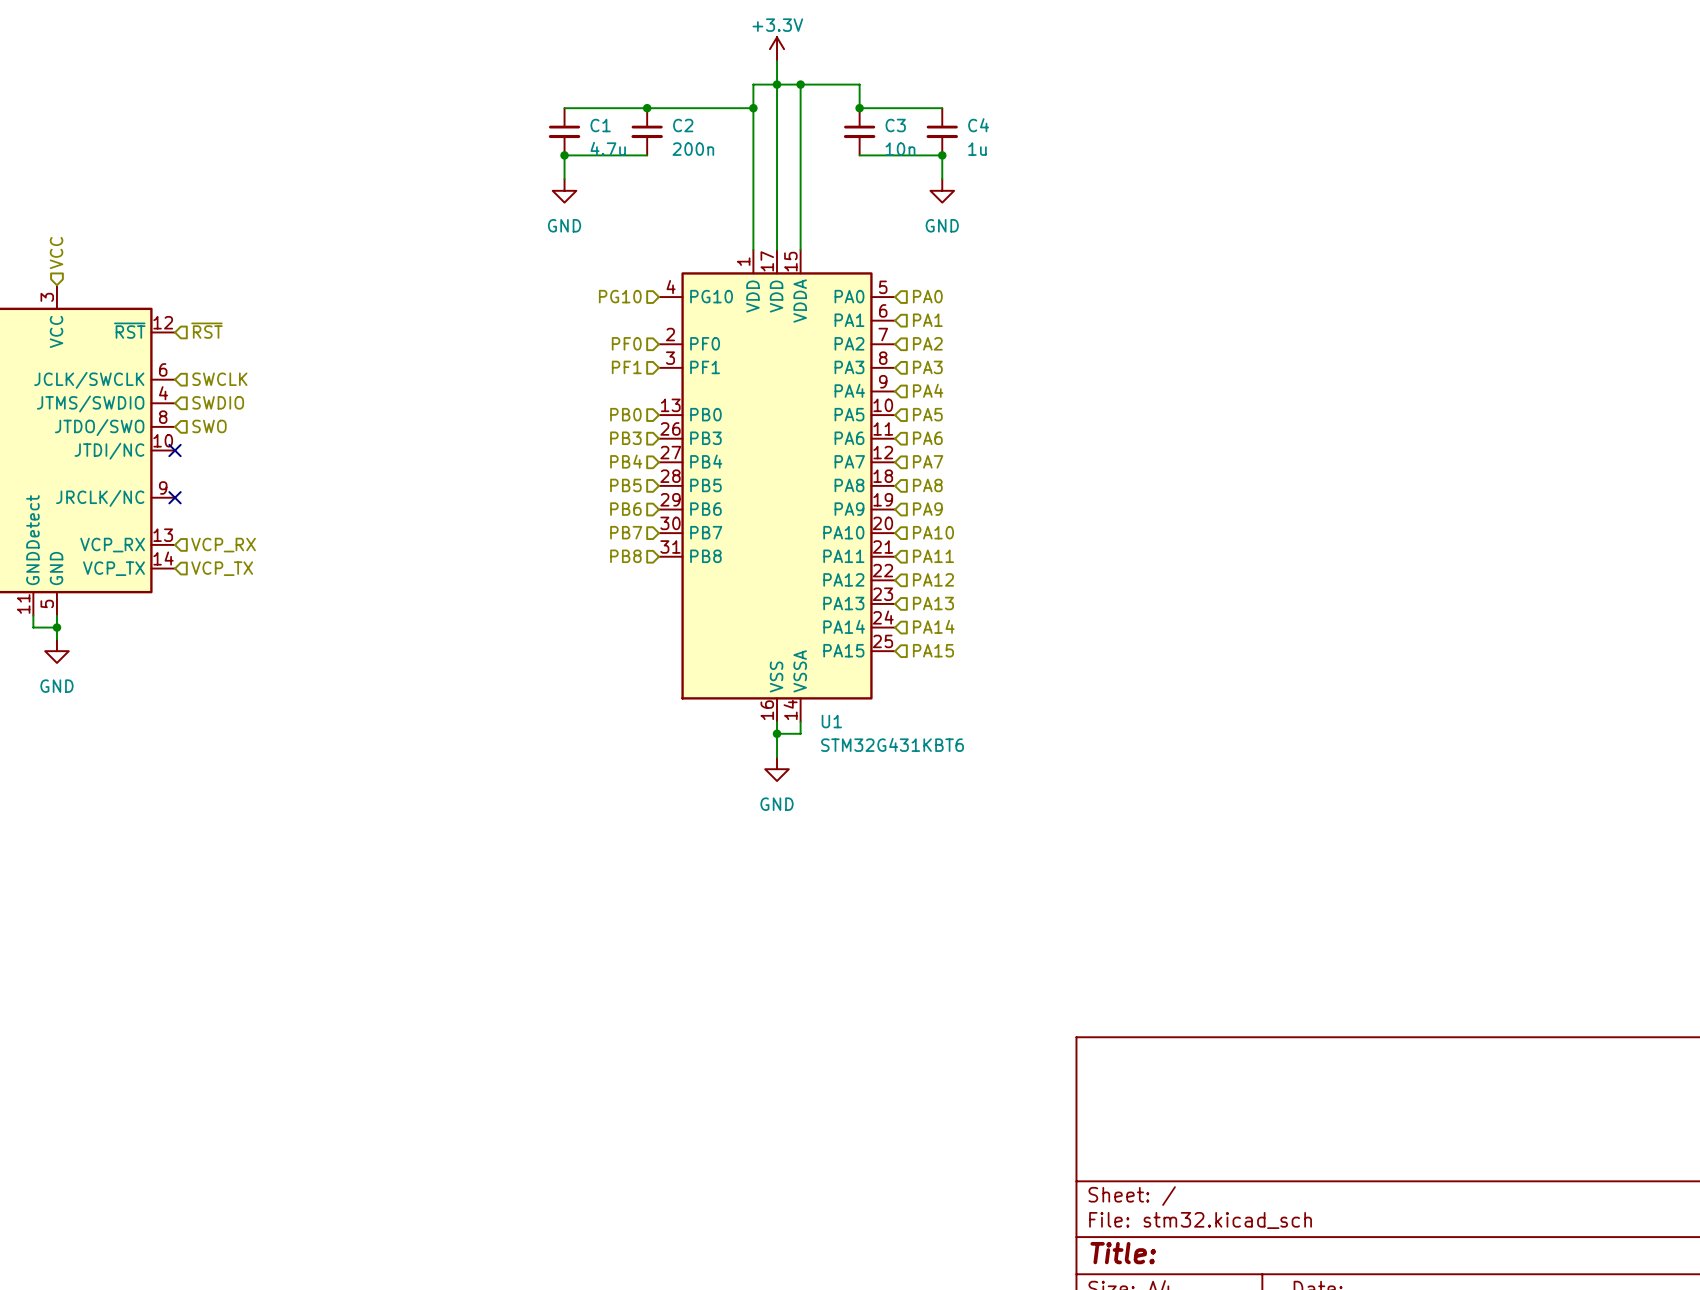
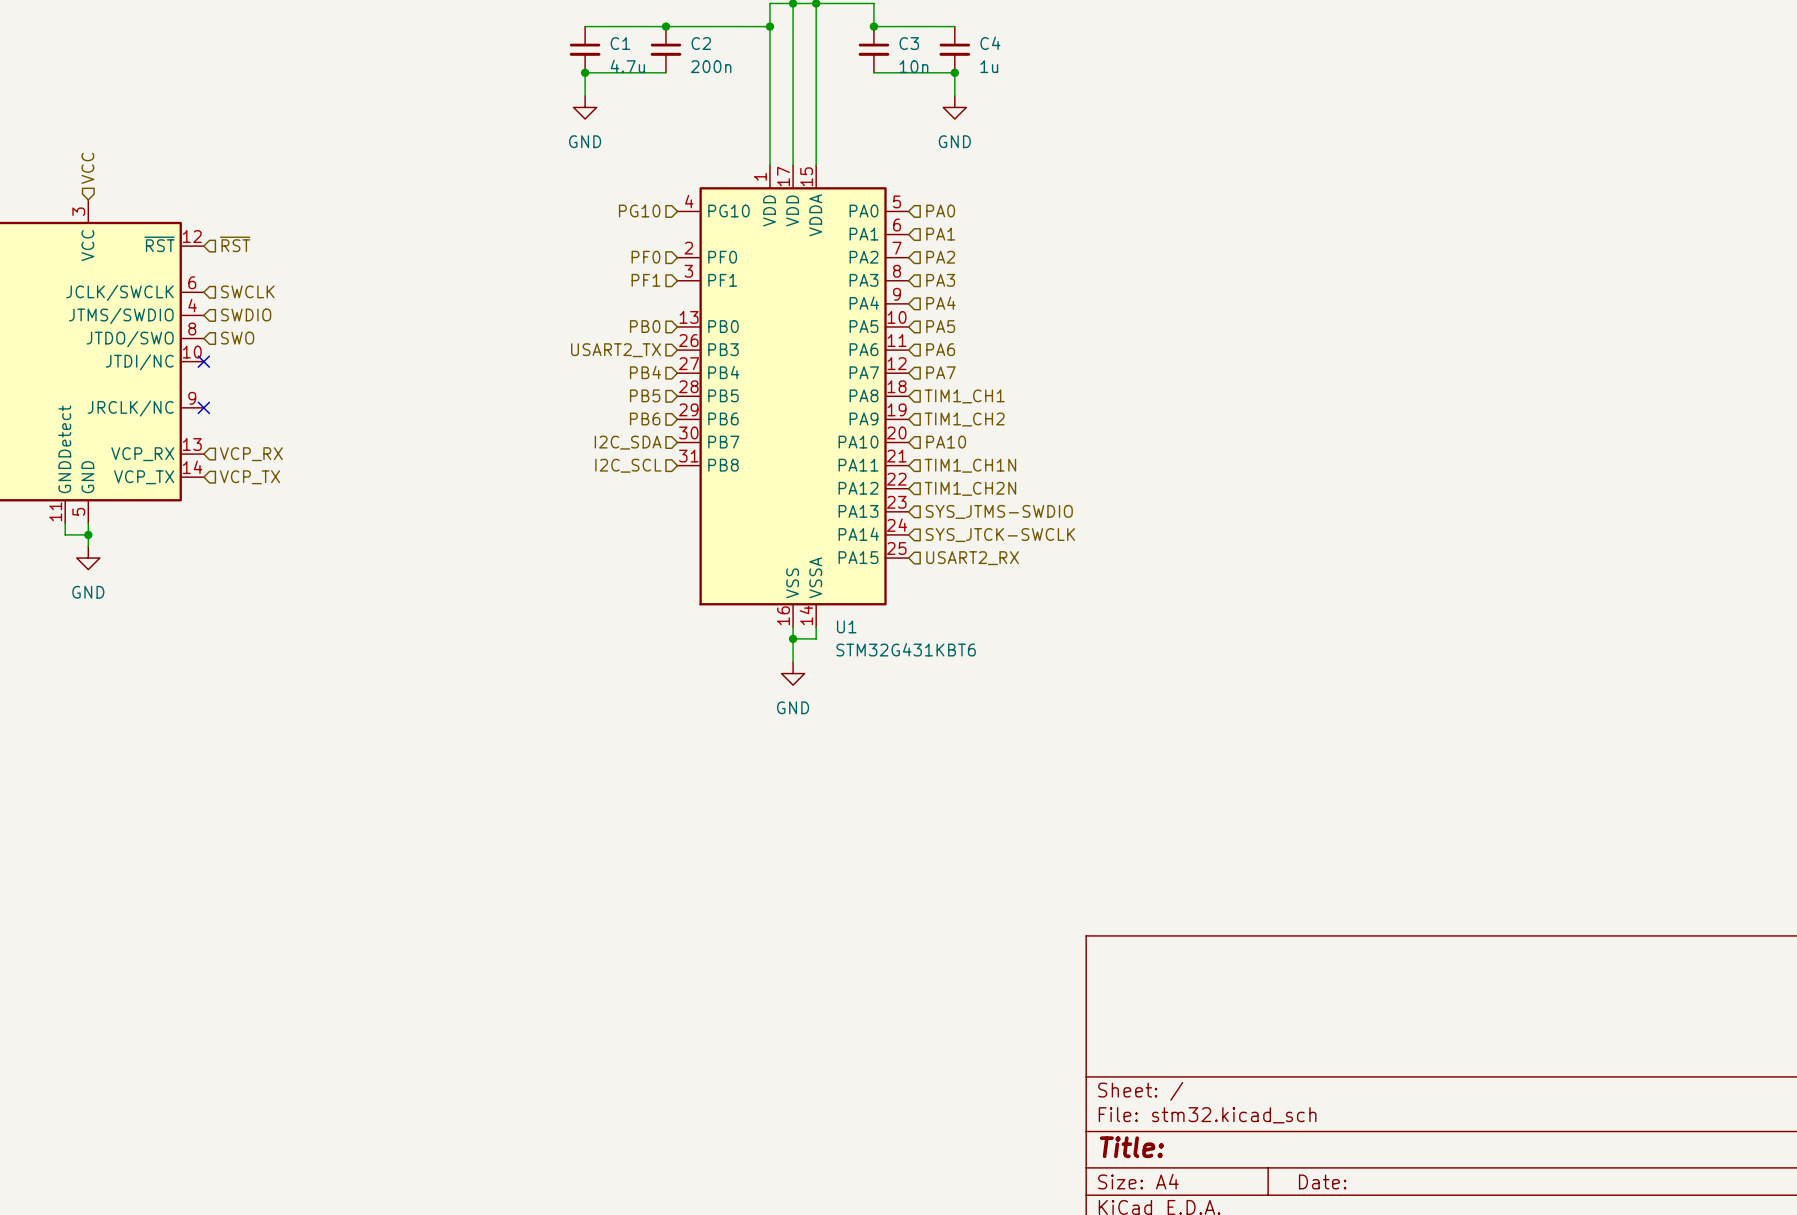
hierarchical label: PB3 (625, 438) -> USART2_TX (616, 350)
hierarchical label: PA8 (927, 485) -> TIM1_CH1 (964, 396)
hierarchical label: PA9 (927, 509) -> TIM1_CH2 (964, 419)
hierarchical label: PB7 (626, 532) -> I2C_SDA (628, 442)
hierarchical label: PB8 (625, 556) -> I2C_SCL (628, 465)
hierarchical label: PA11 (933, 556) -> TIM1_CH1N (970, 465)
hierarchical label: PA12 (933, 579) -> TIM1_CH2N (970, 488)
hierarchical label: PA13 (933, 603) -> SYS_JTMS-SWDIO (999, 511)
hierarchical label: PA14 (933, 626) -> SYS_JTCK-SWCLK (1000, 535)
hierarchical label: PA15 (933, 650) -> USART2_RX (972, 558)

